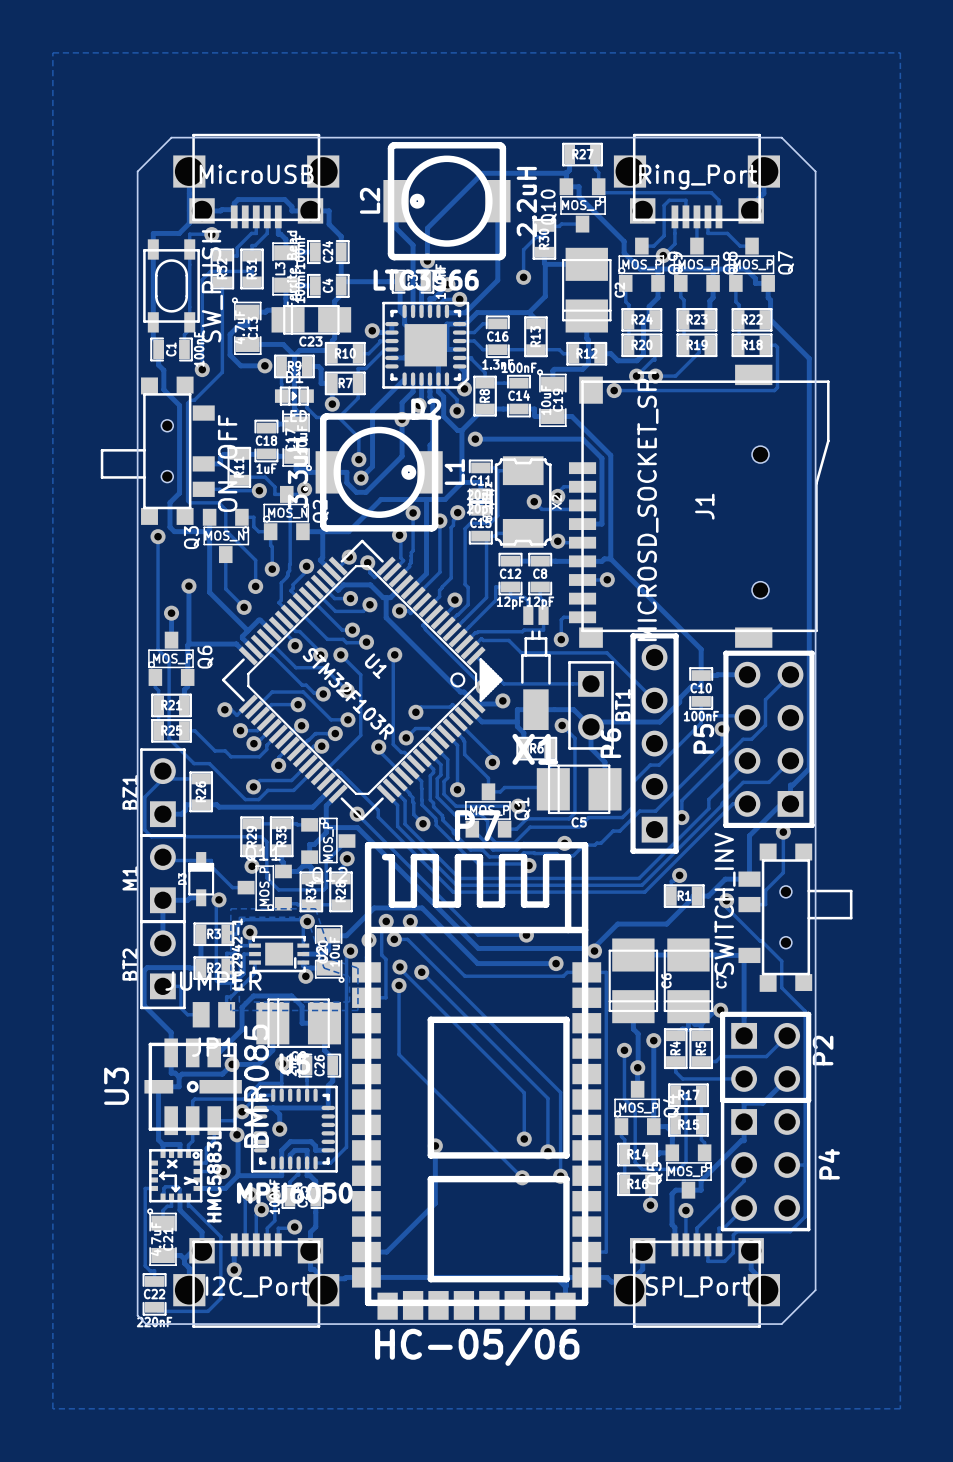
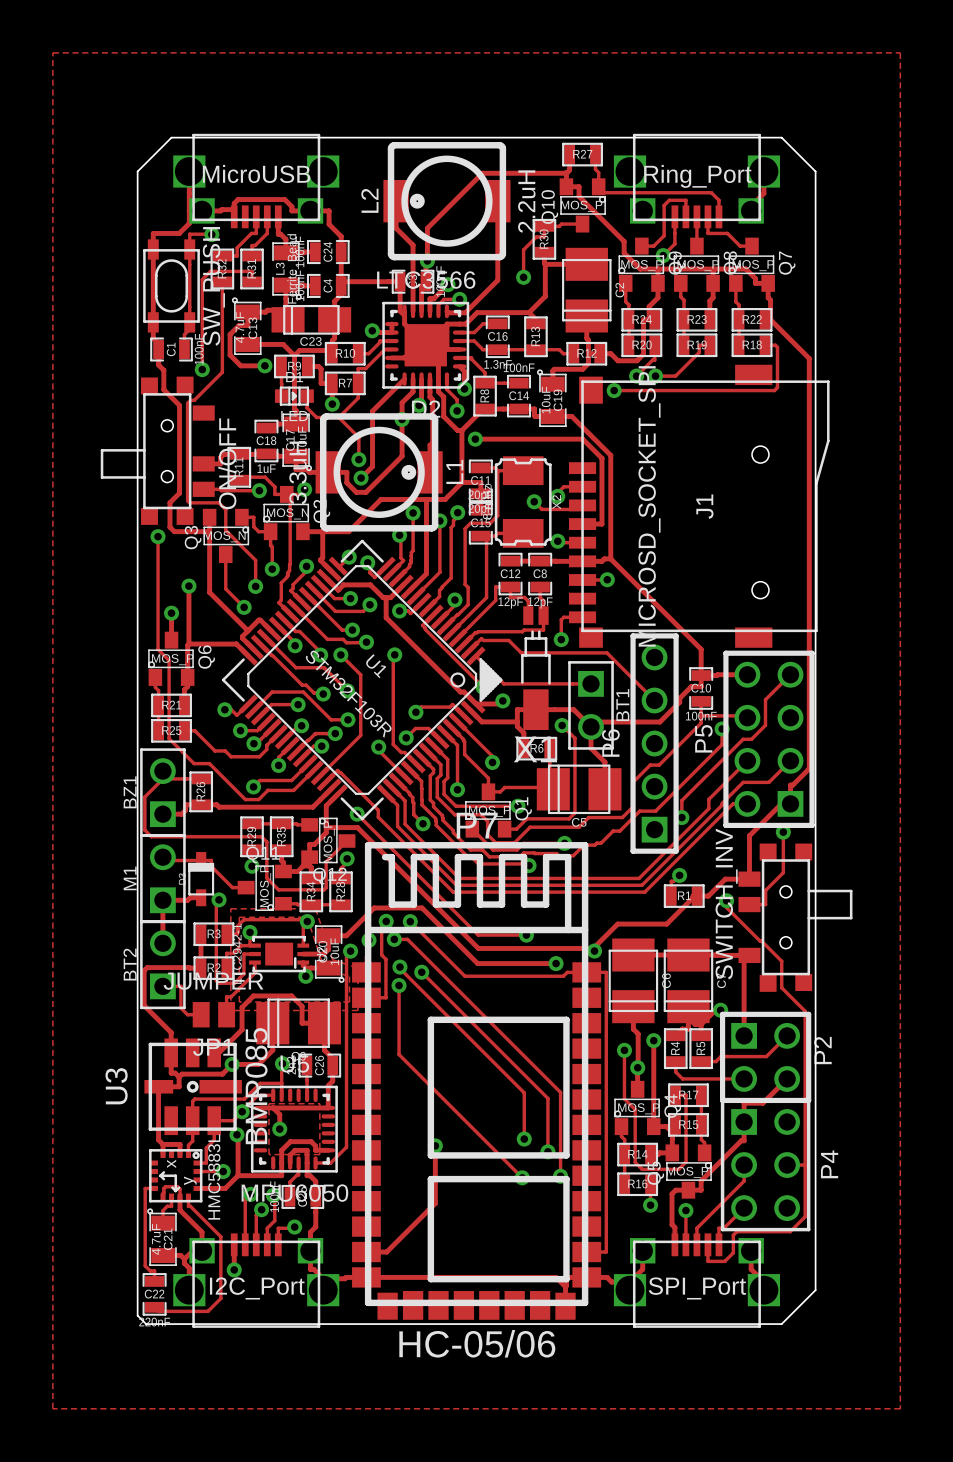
zone outline: none -> (268, 1103) (319, 1103) (319, 1154) (268, 1154) (268, 1103)

